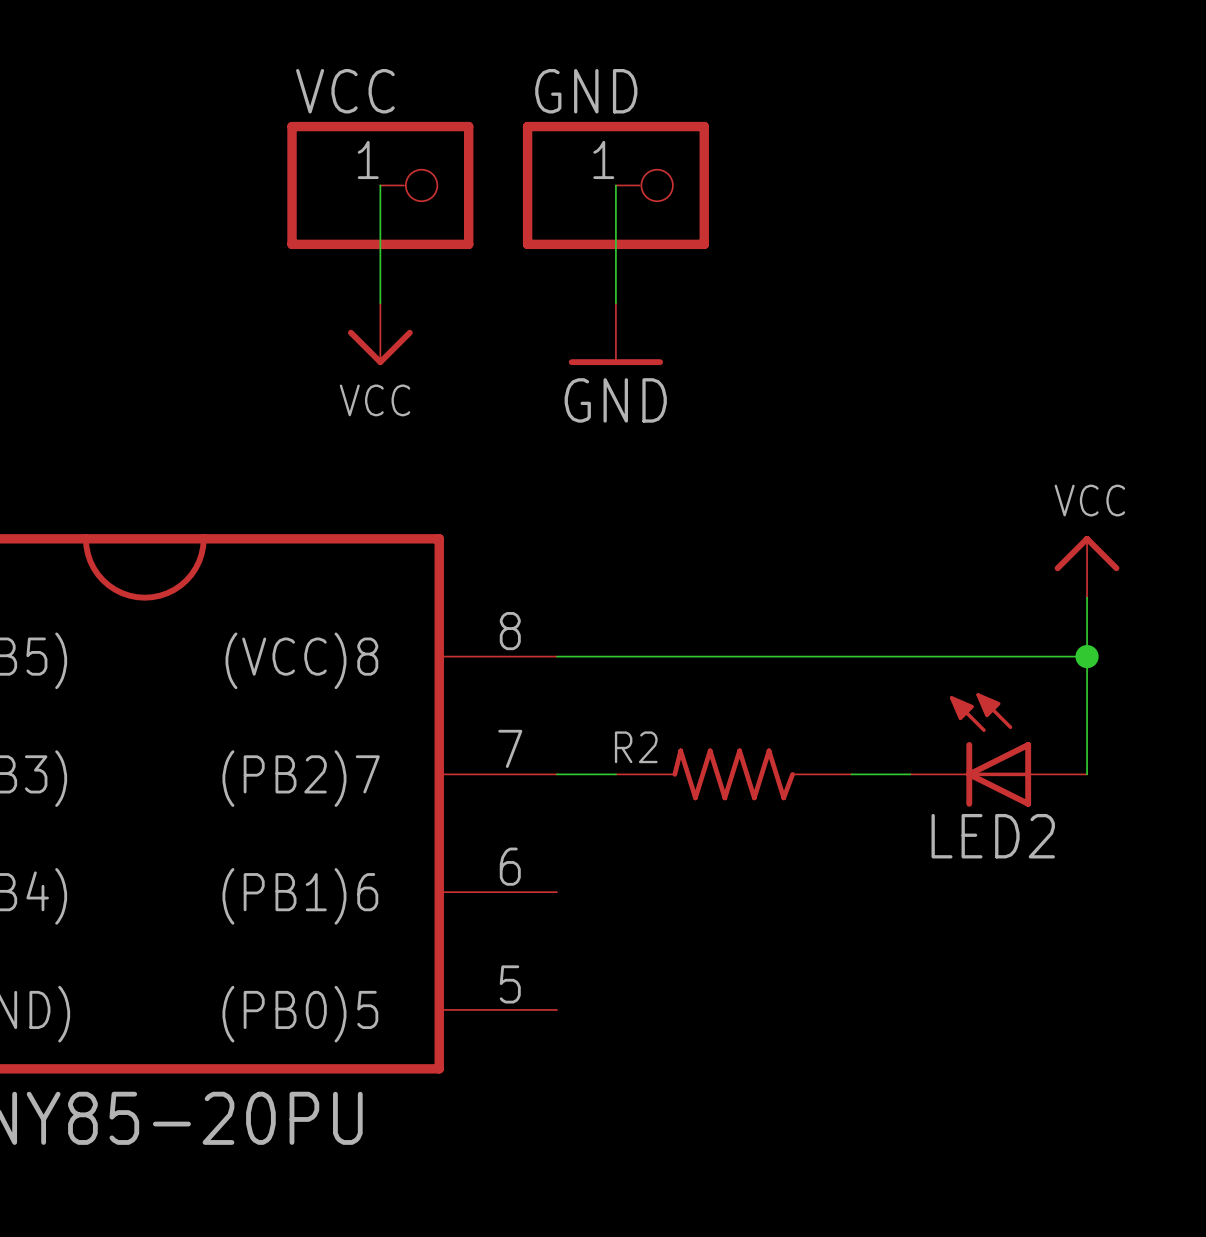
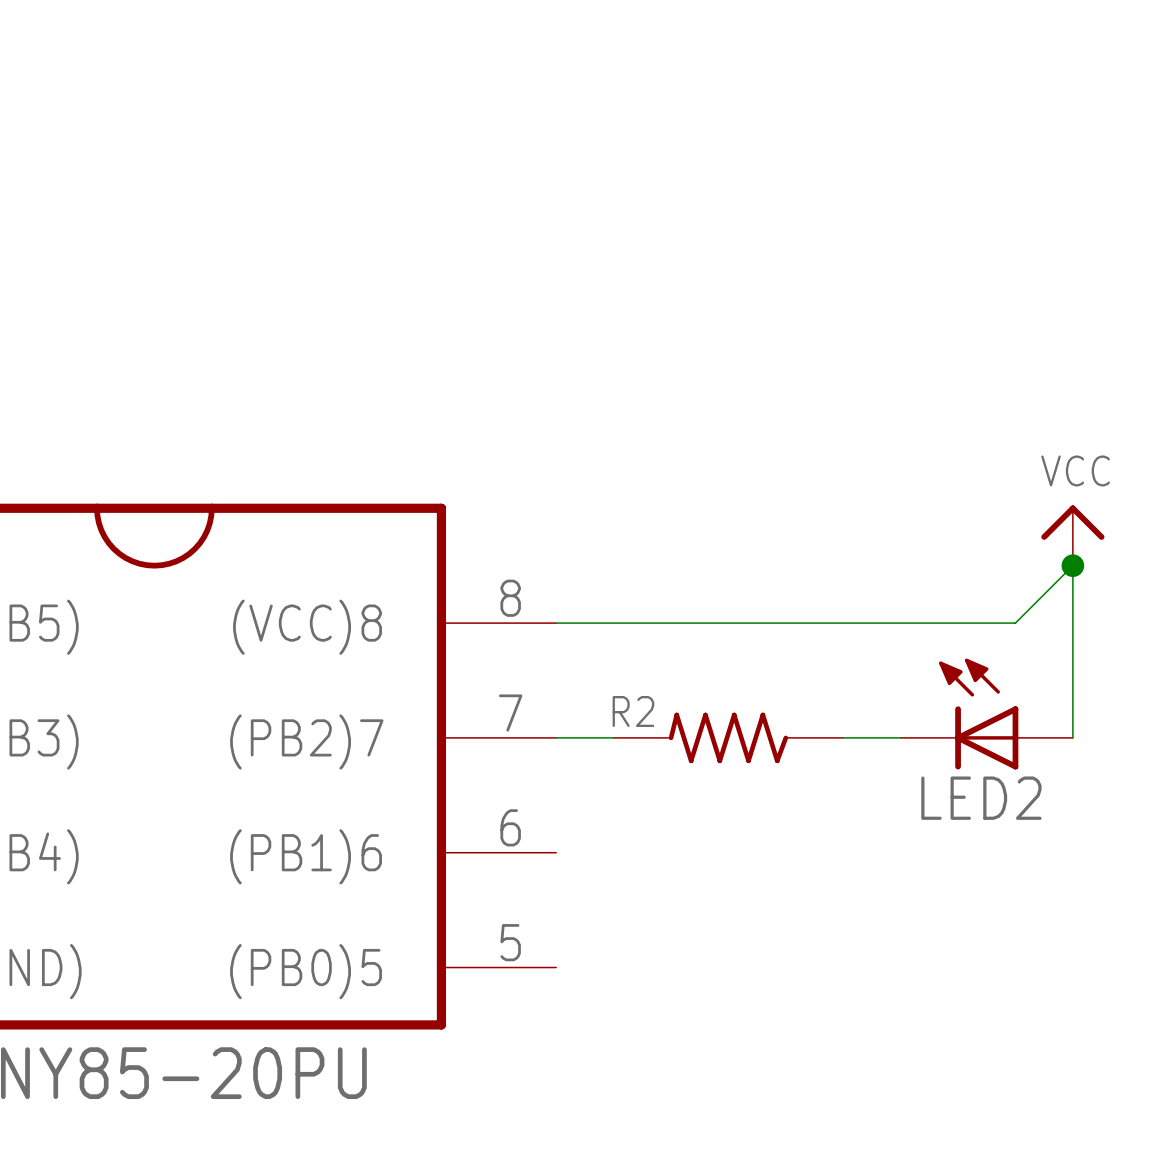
wire: (380, 185) (380, 303) -> none
VCC: (380, 185) -> none
wire: (615, 185) (615, 303) -> none
GND: (615, 185) -> none
power symbol: VCC (380, 334) -> none
power symbol: GND (615, 334) -> none
wire: (1028, 656) (1087, 656) -> (1015, 623) (1072, 565)
junction position: (1087, 656) -> (1072, 565)

